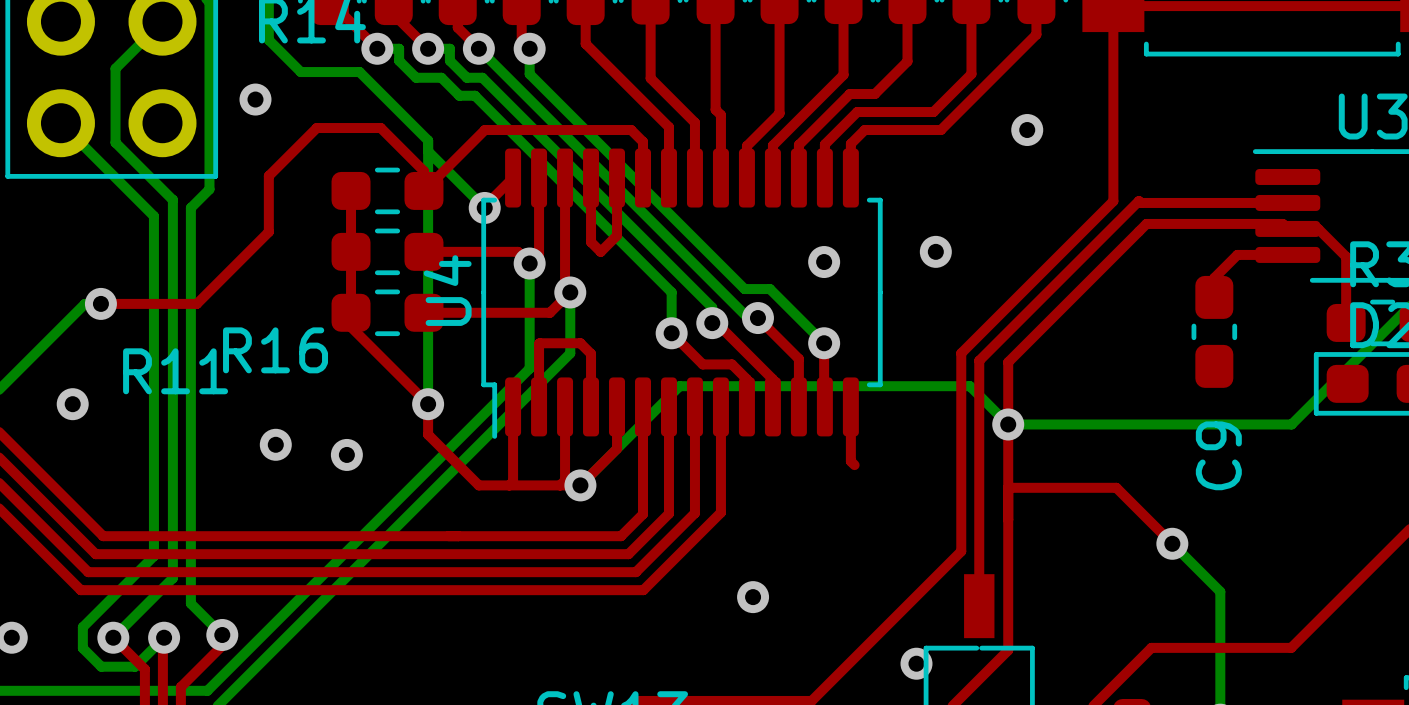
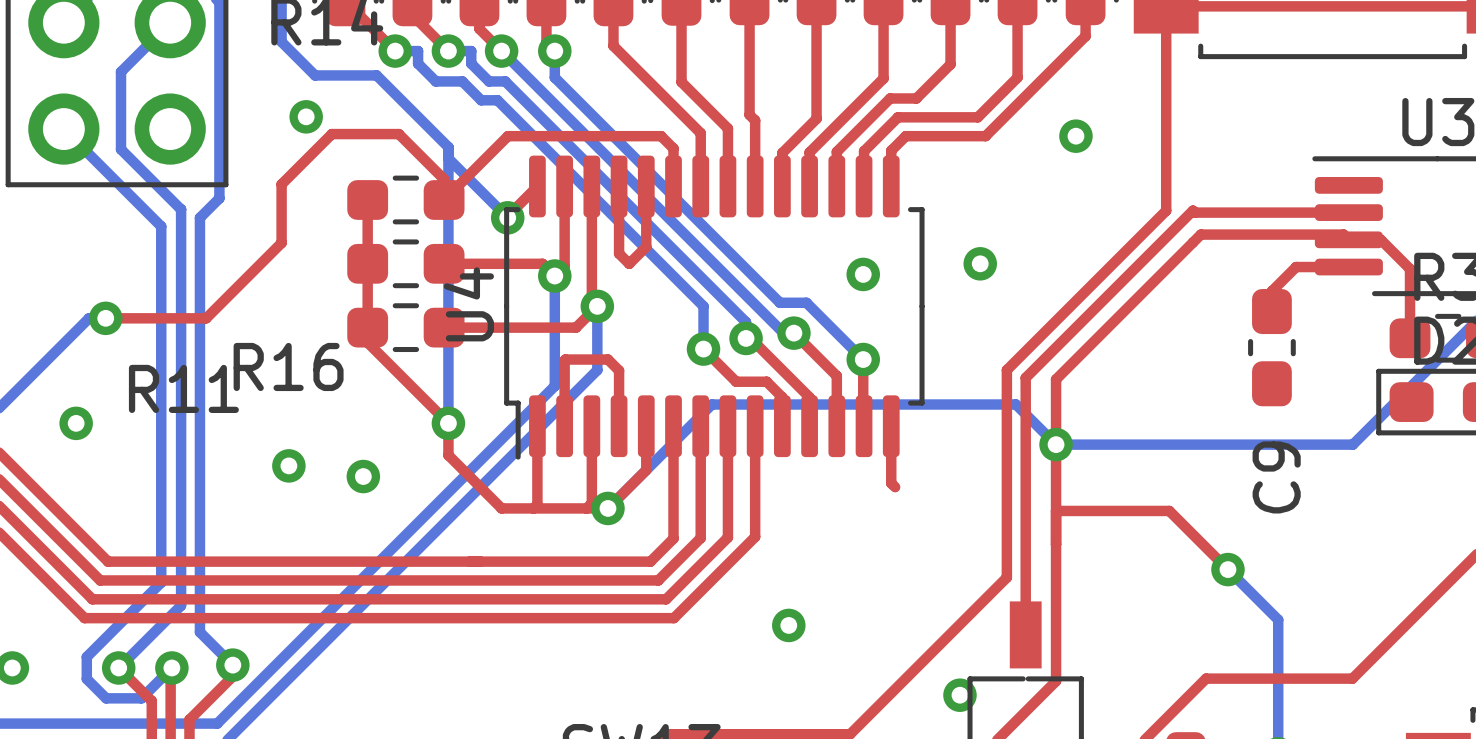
via position: (255, 99) -> (306, 116)

